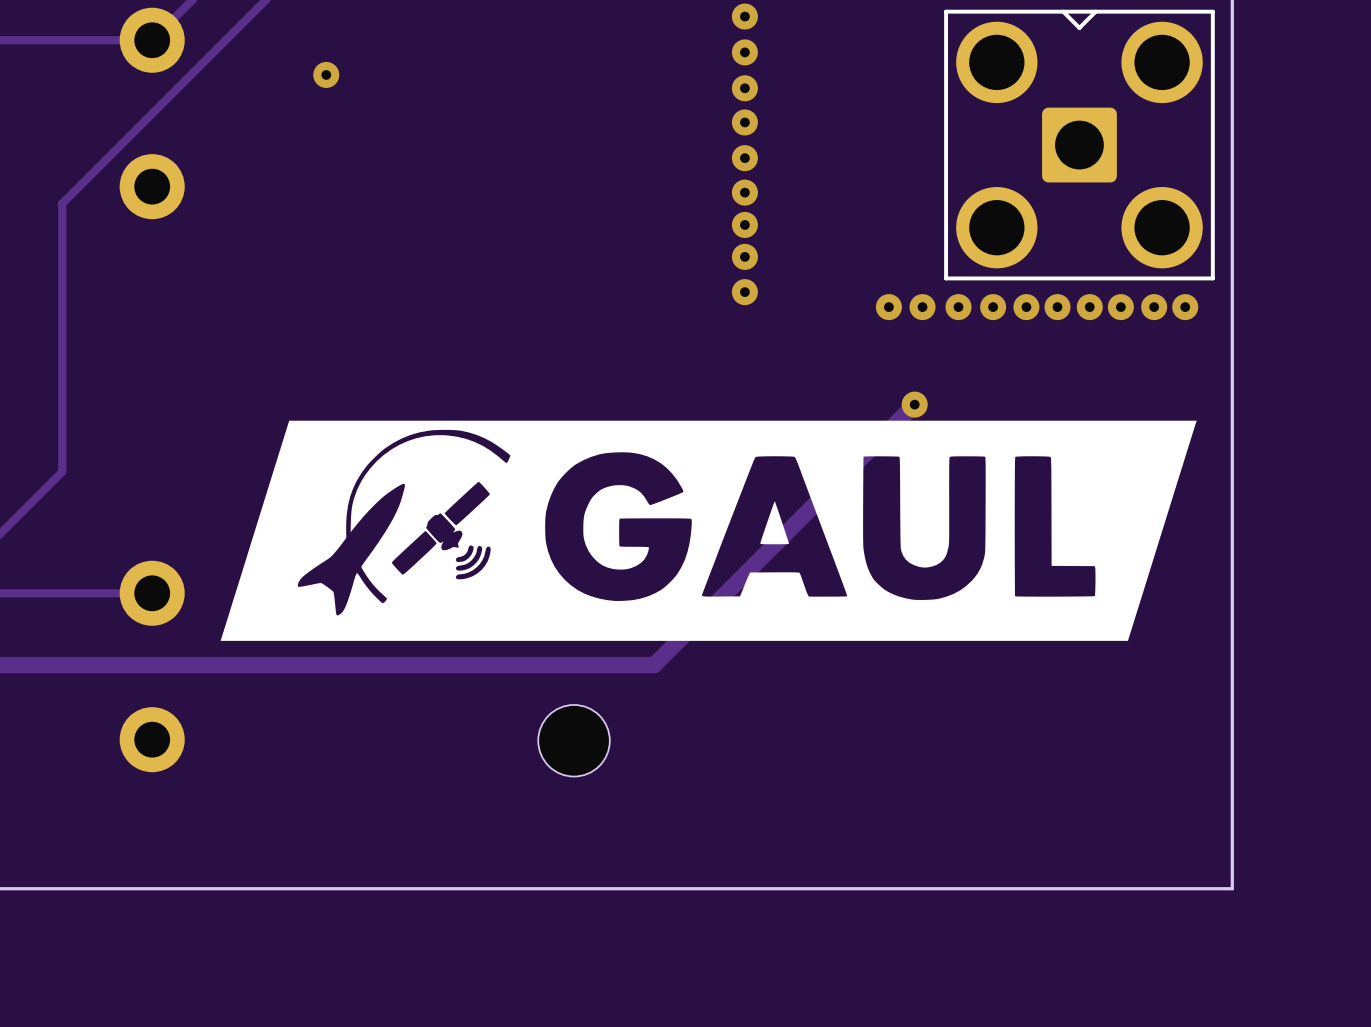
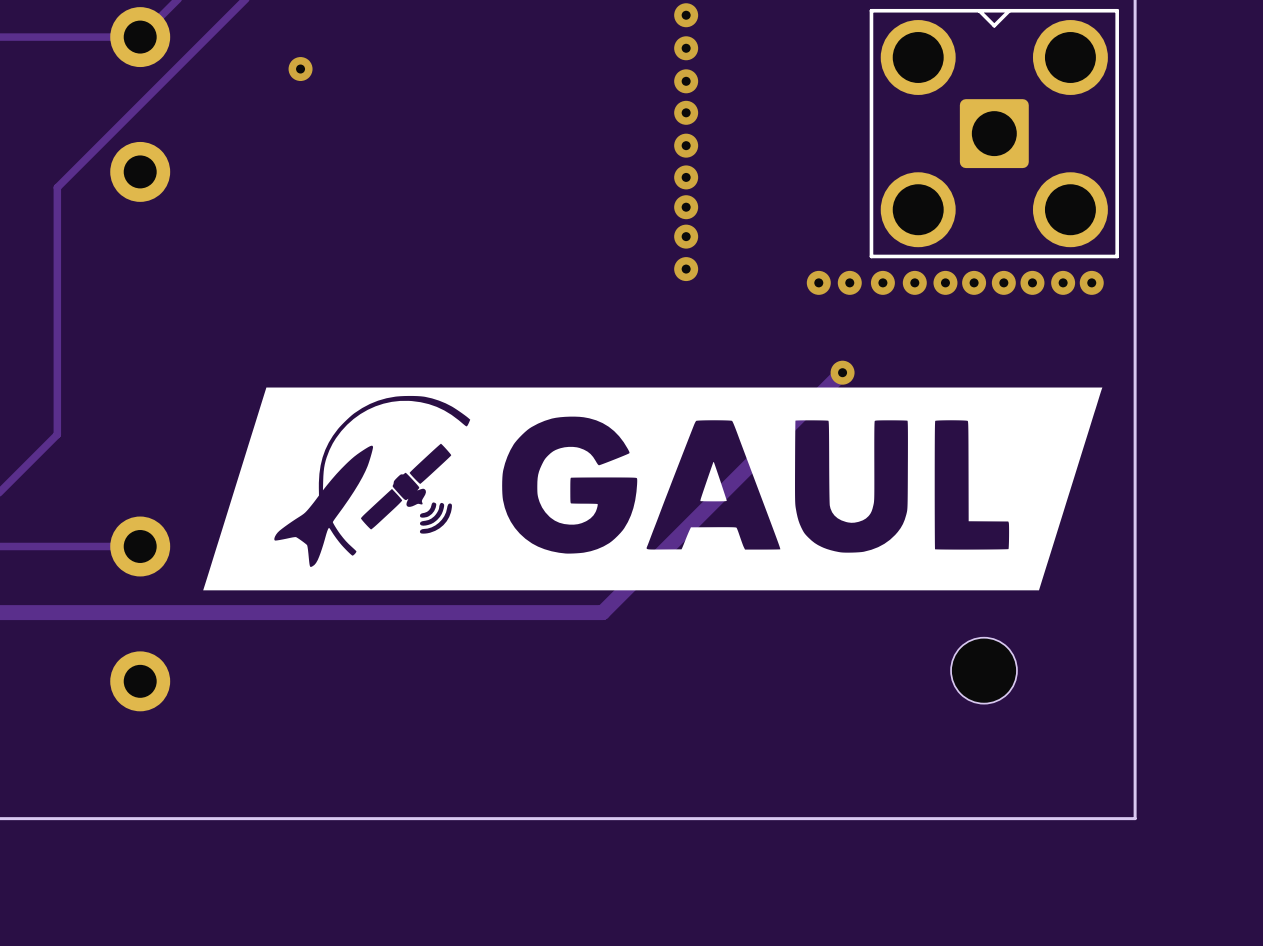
part position: (574, 740) -> (984, 670)

